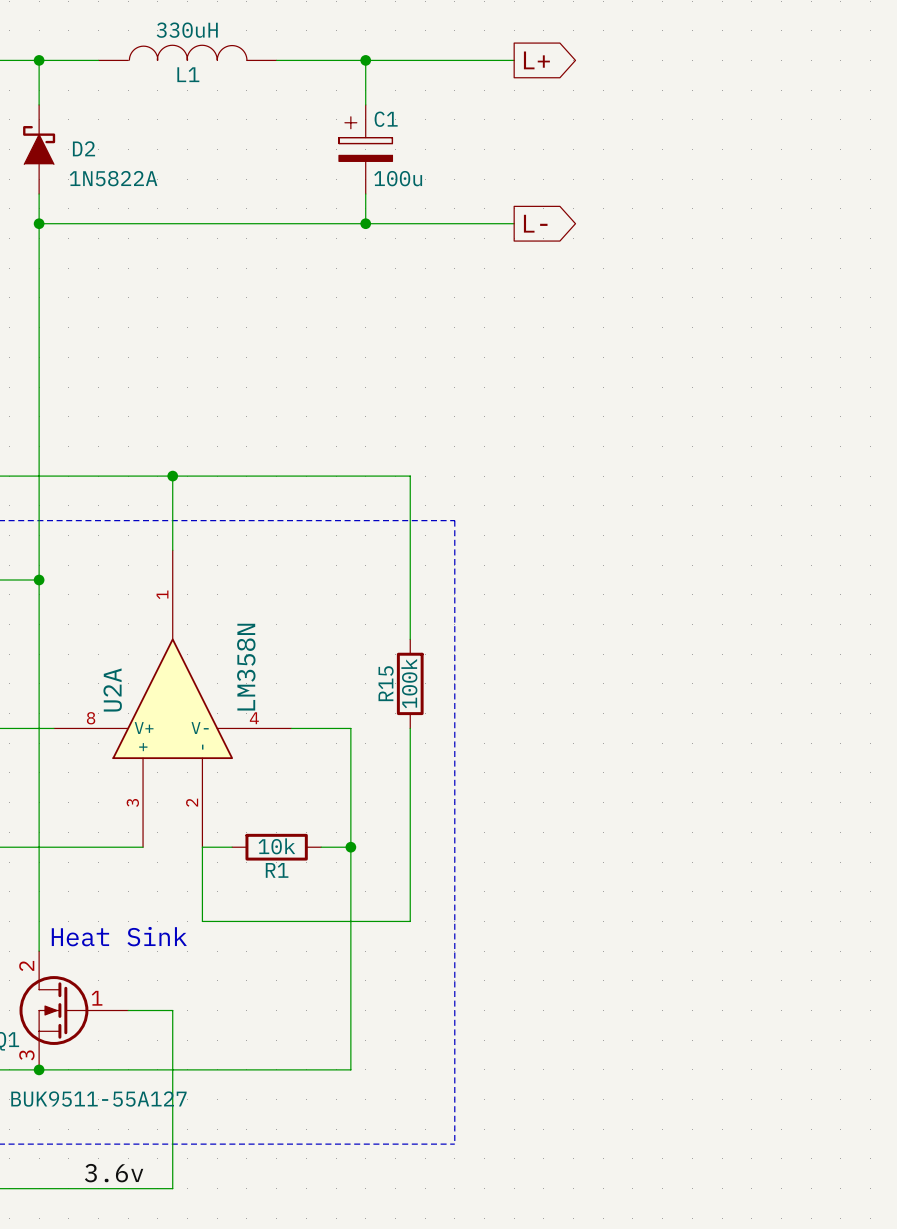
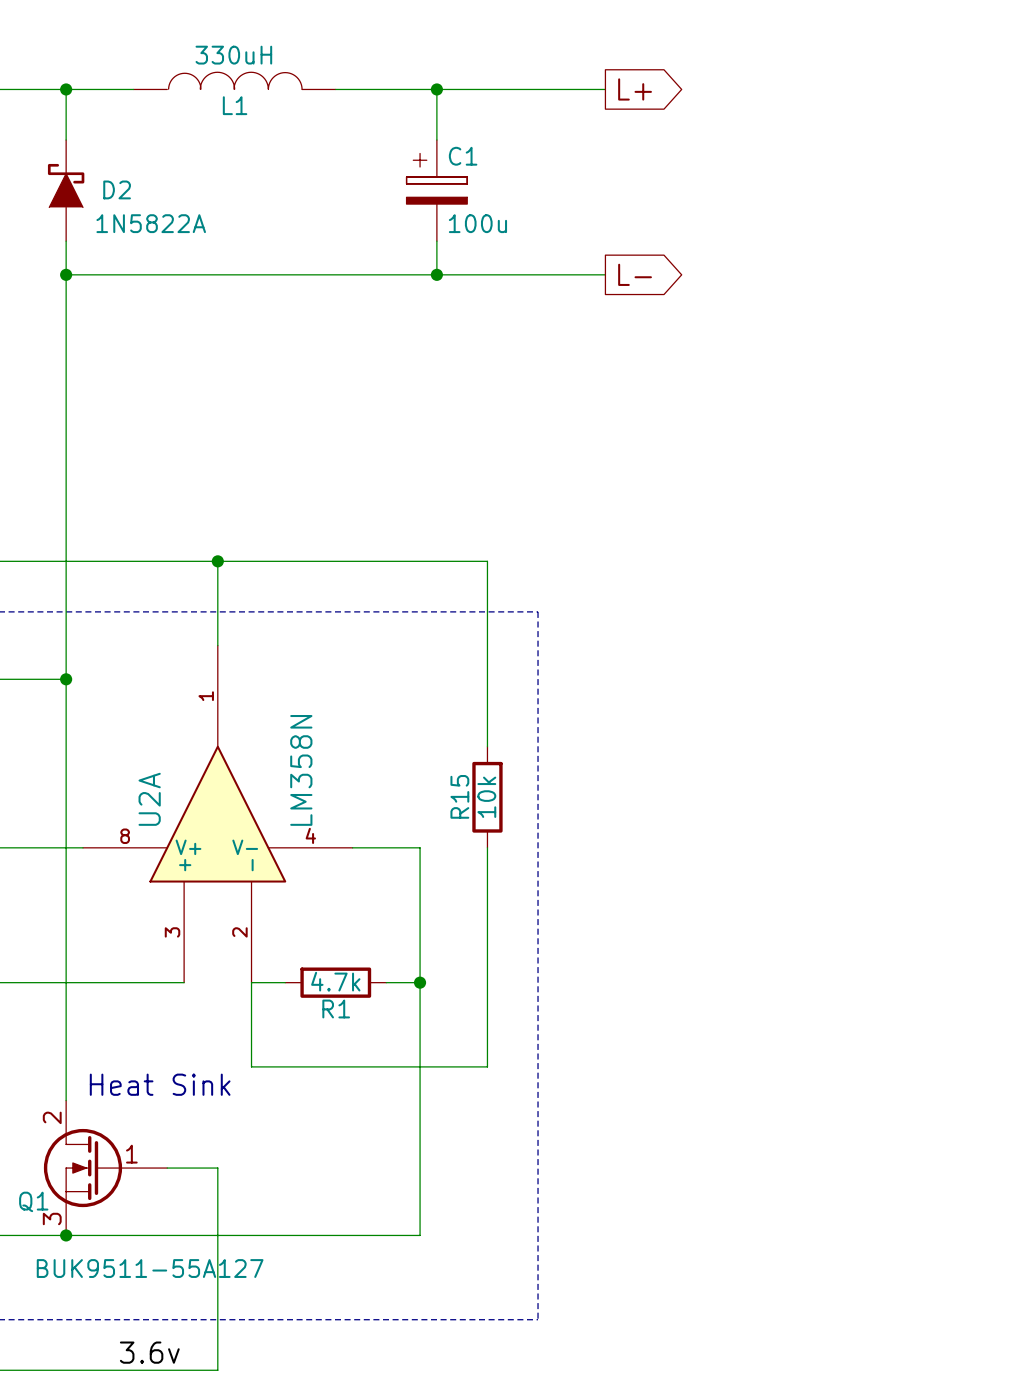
R15 value: 100k (409, 683) -> 10k (486, 797)
R1 value: 10k (276, 846) -> 4.7k (335, 981)

